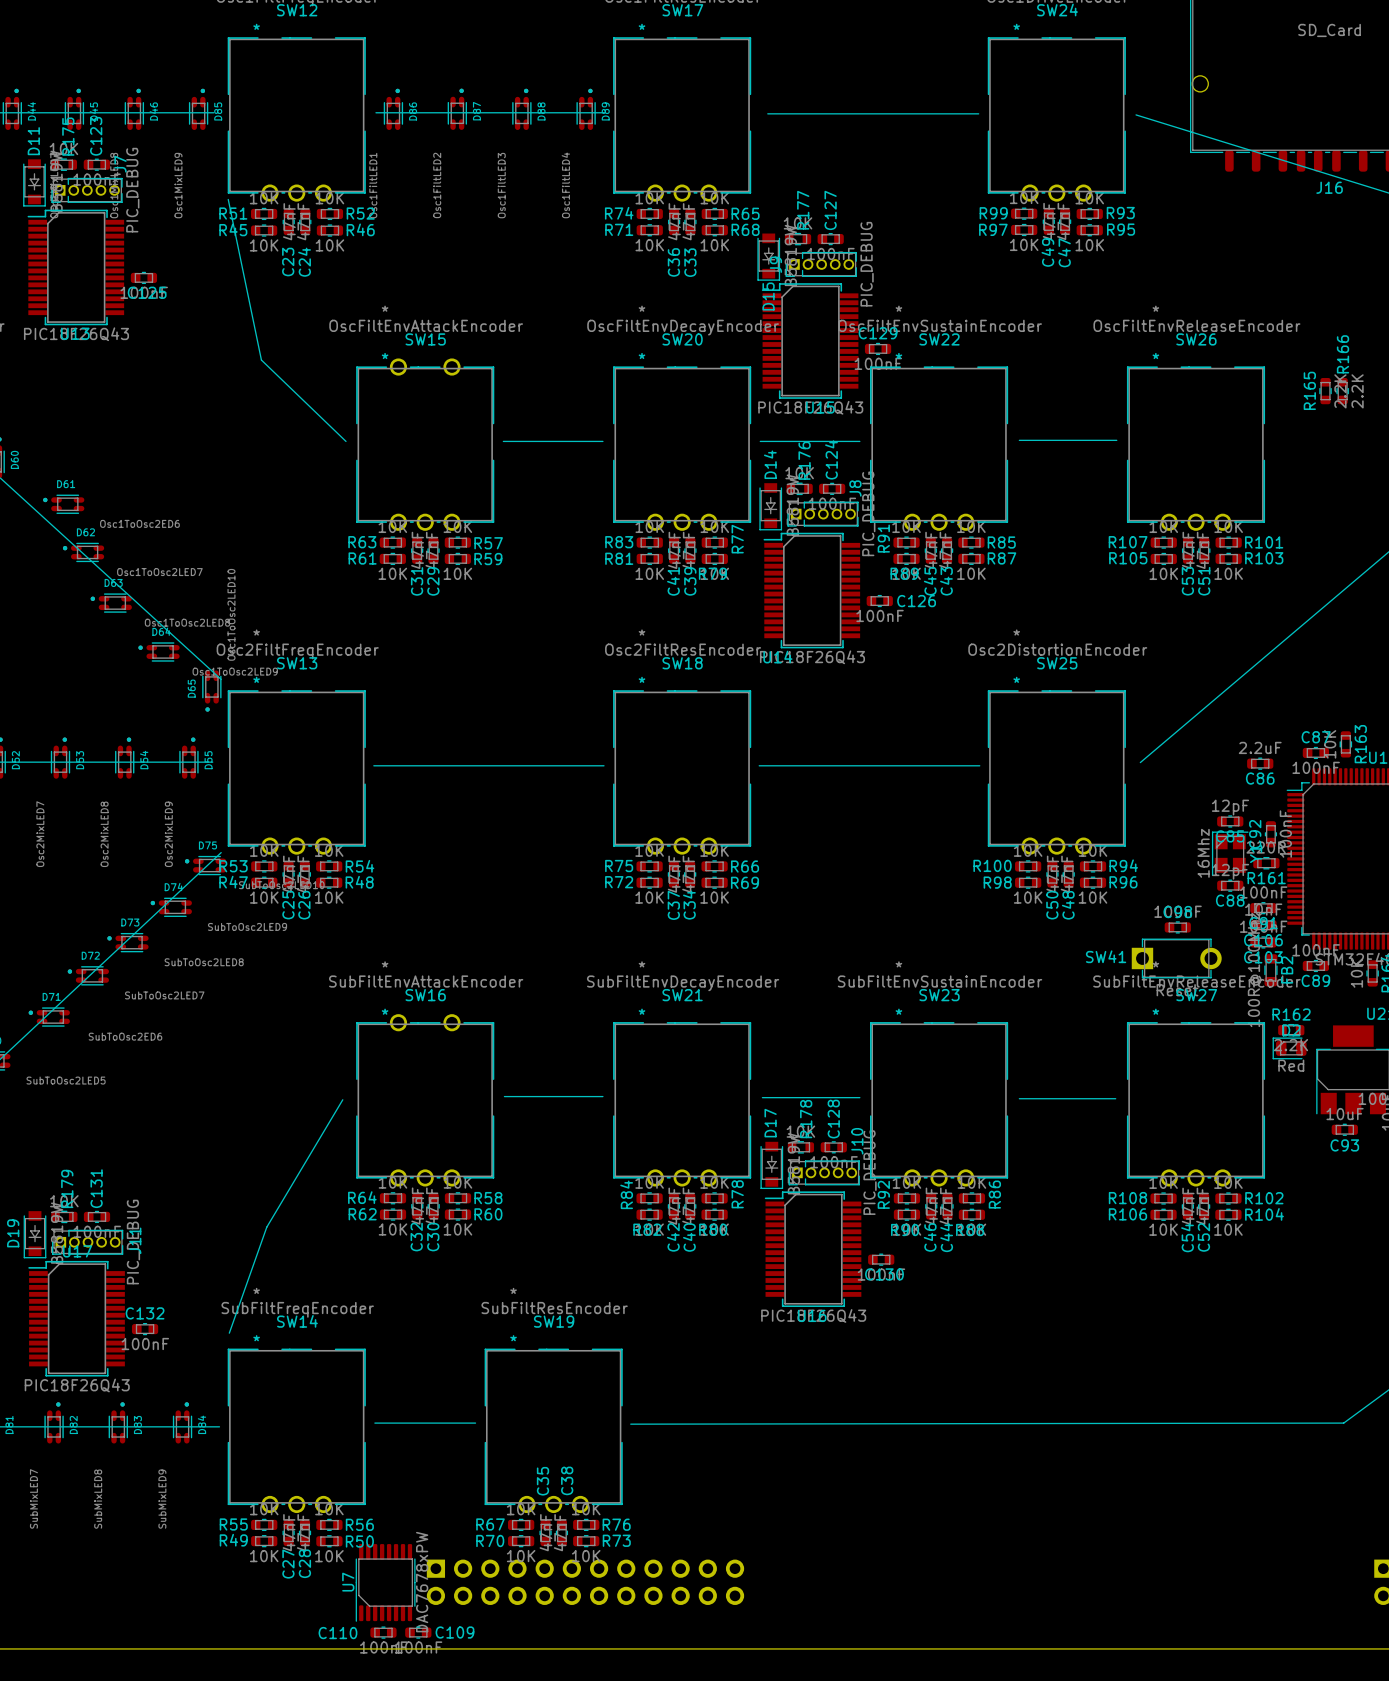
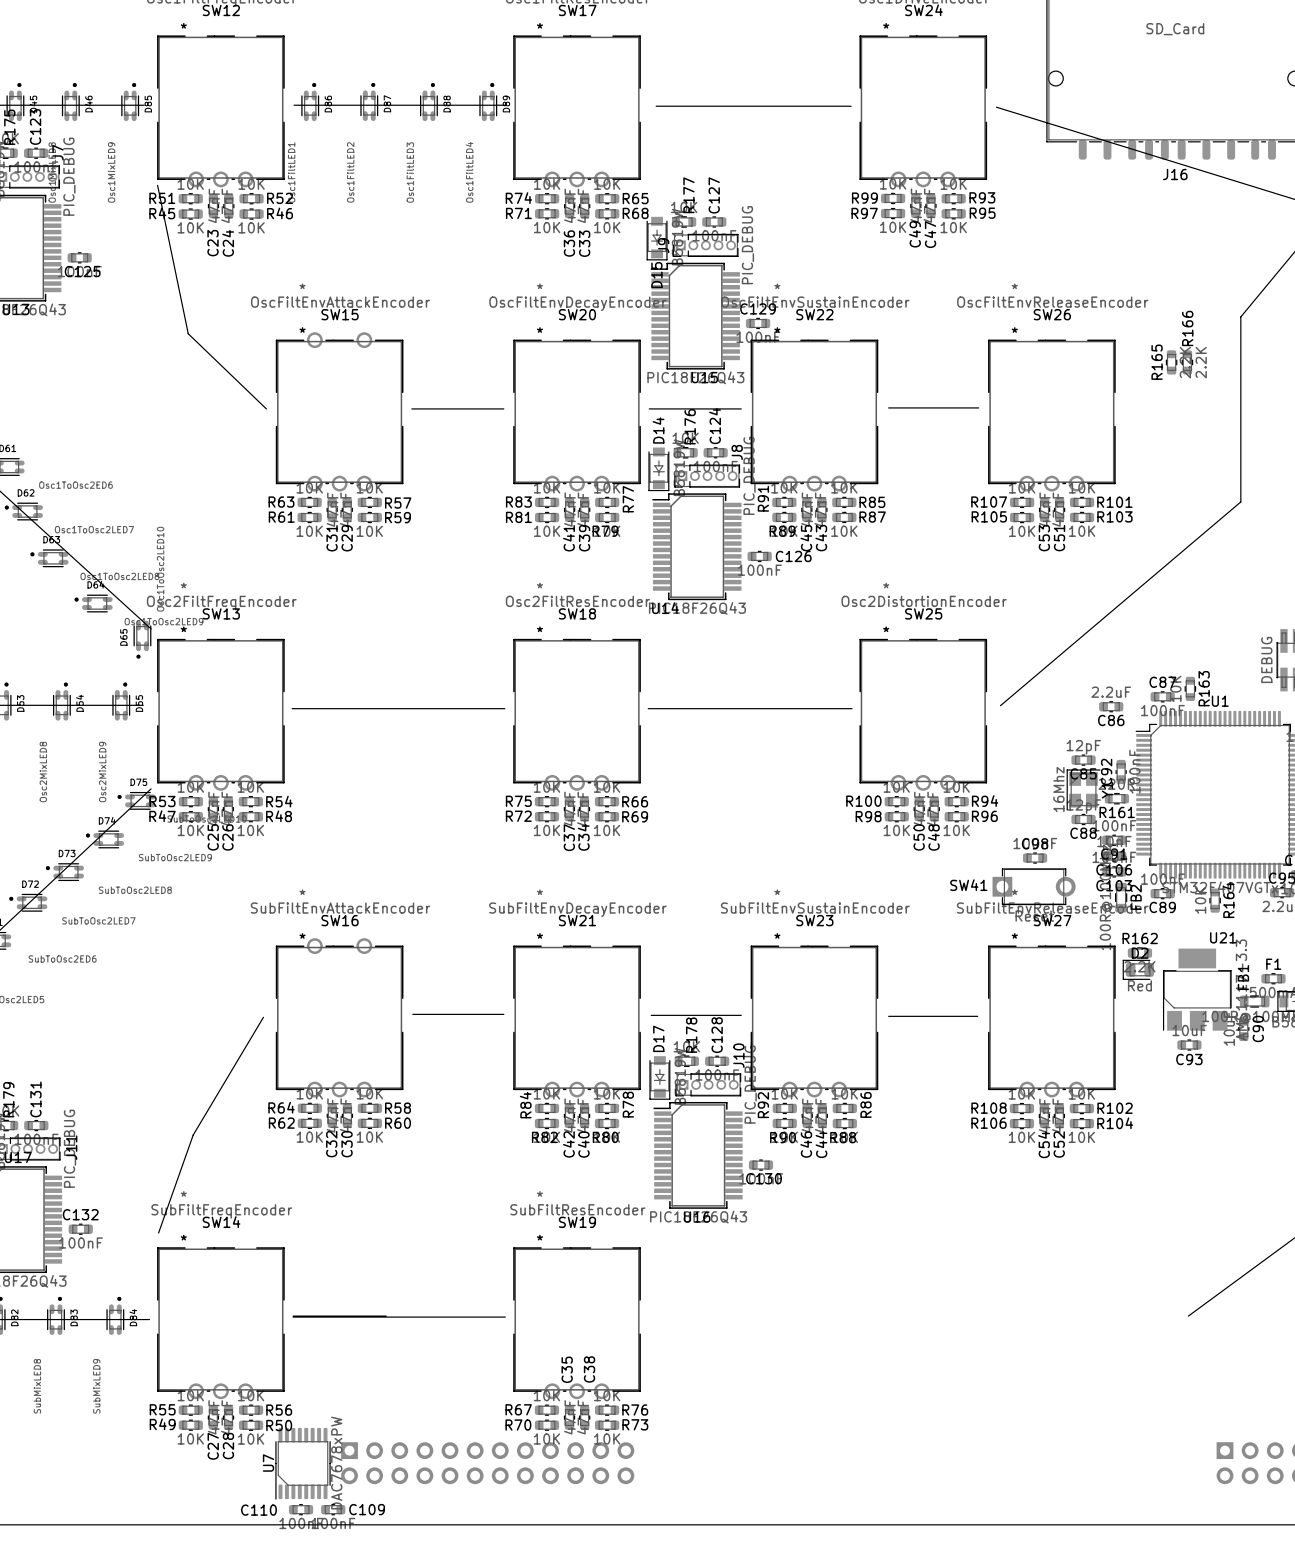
line: (1343, 1423) (630, 1424) -> none
line: none -> (293, 1317) (505, 1317)
SW19 position: (553, 1430) -> (577, 1323)
R67 position: (521, 1524) -> (546, 1410)
R76 position: (586, 1524) -> (607, 1410)
C35 position: (545, 1532) -> (569, 1417)
C38 position: (561, 1532) -> (584, 1417)
R70 position: (521, 1541) -> (546, 1425)
R73 position: (586, 1541) -> (607, 1425)

